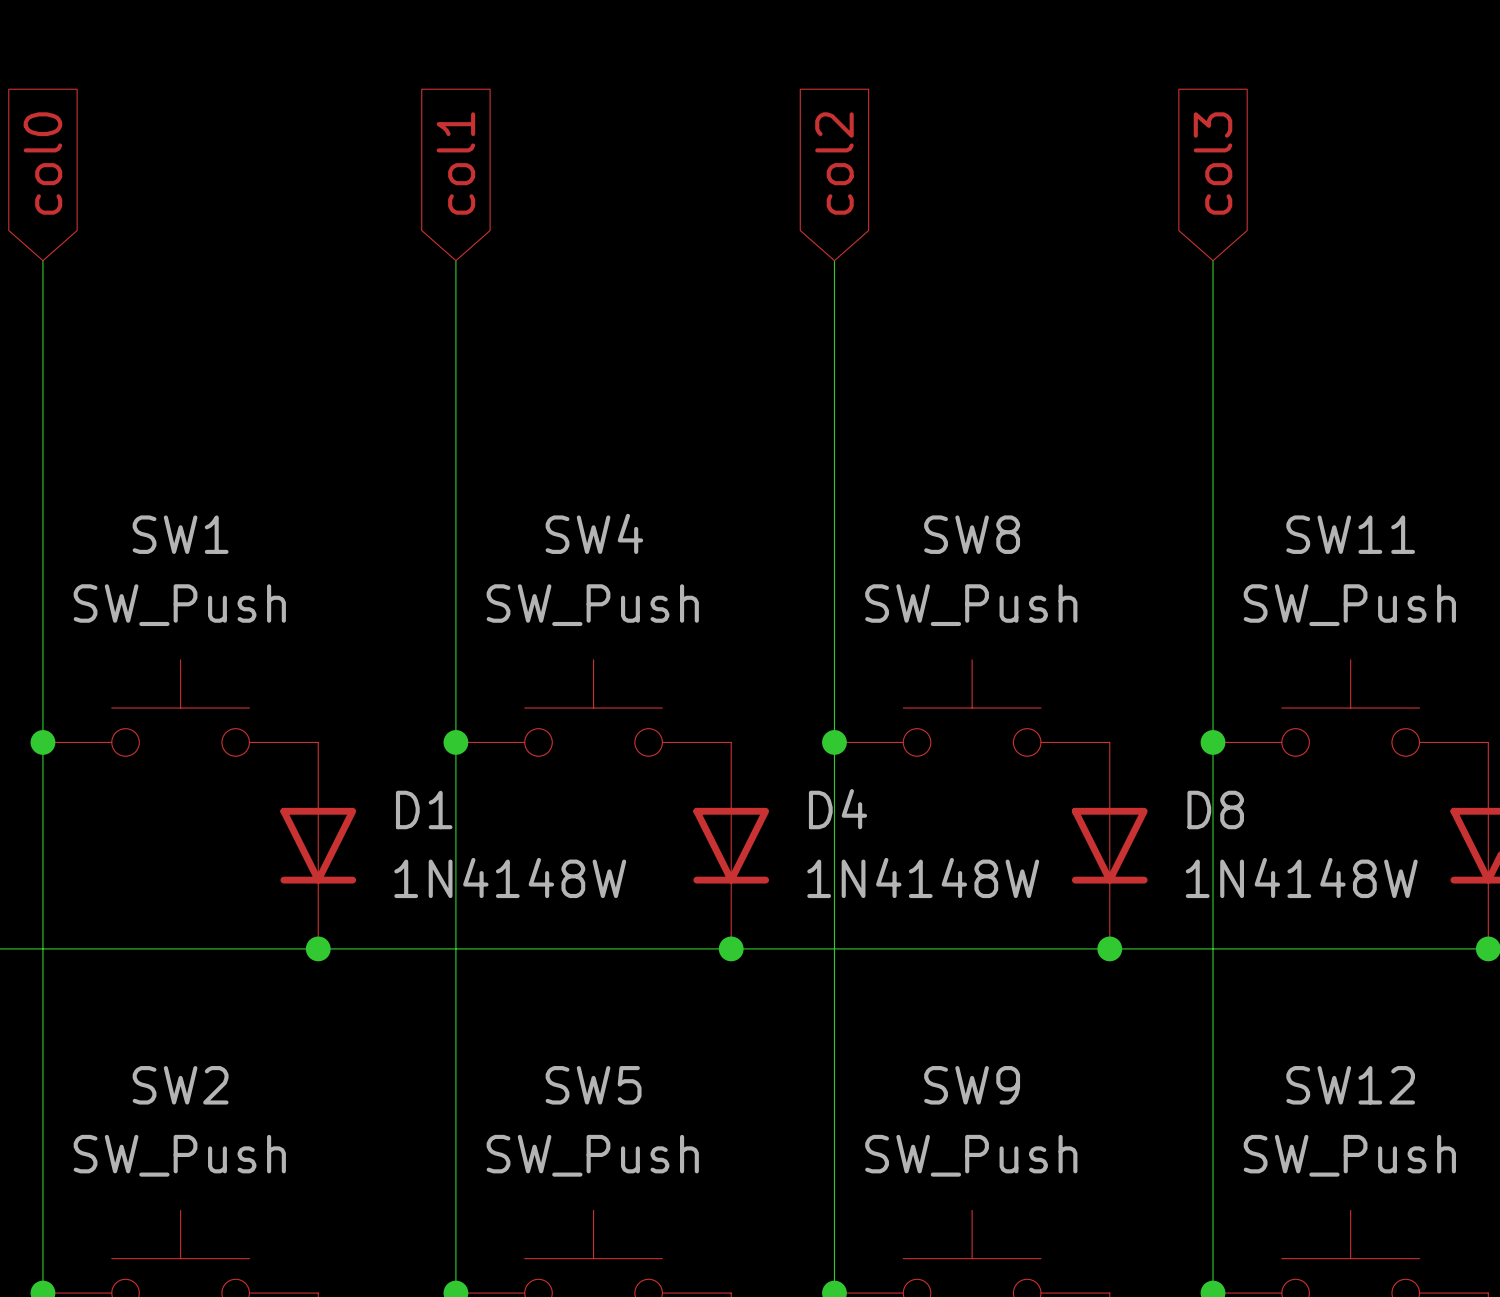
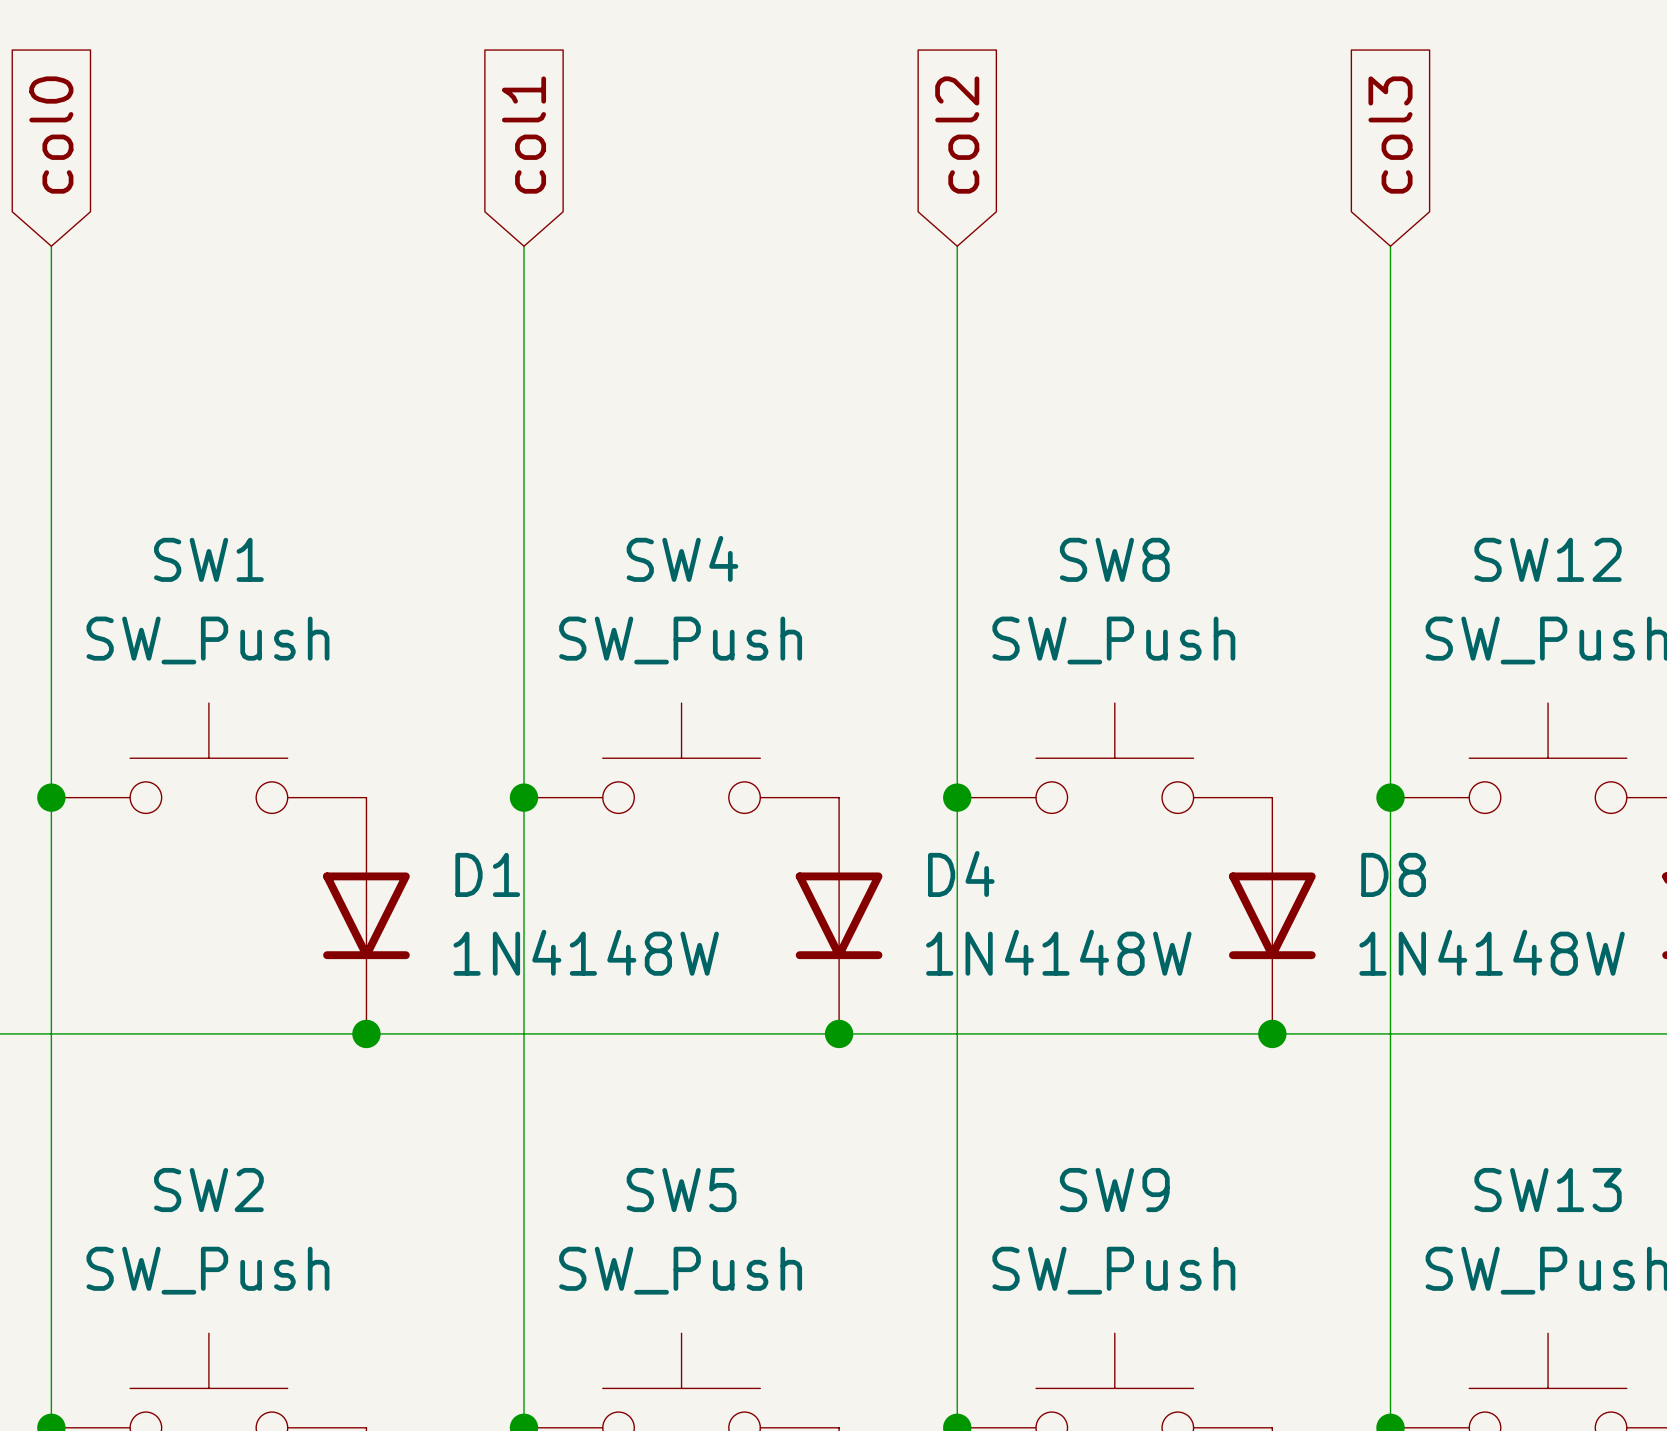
SW11 name: SW11 (1350, 534) -> SW12 (1548, 559)
SW12 name: SW12 (1350, 1085) -> SW13 (1548, 1190)

